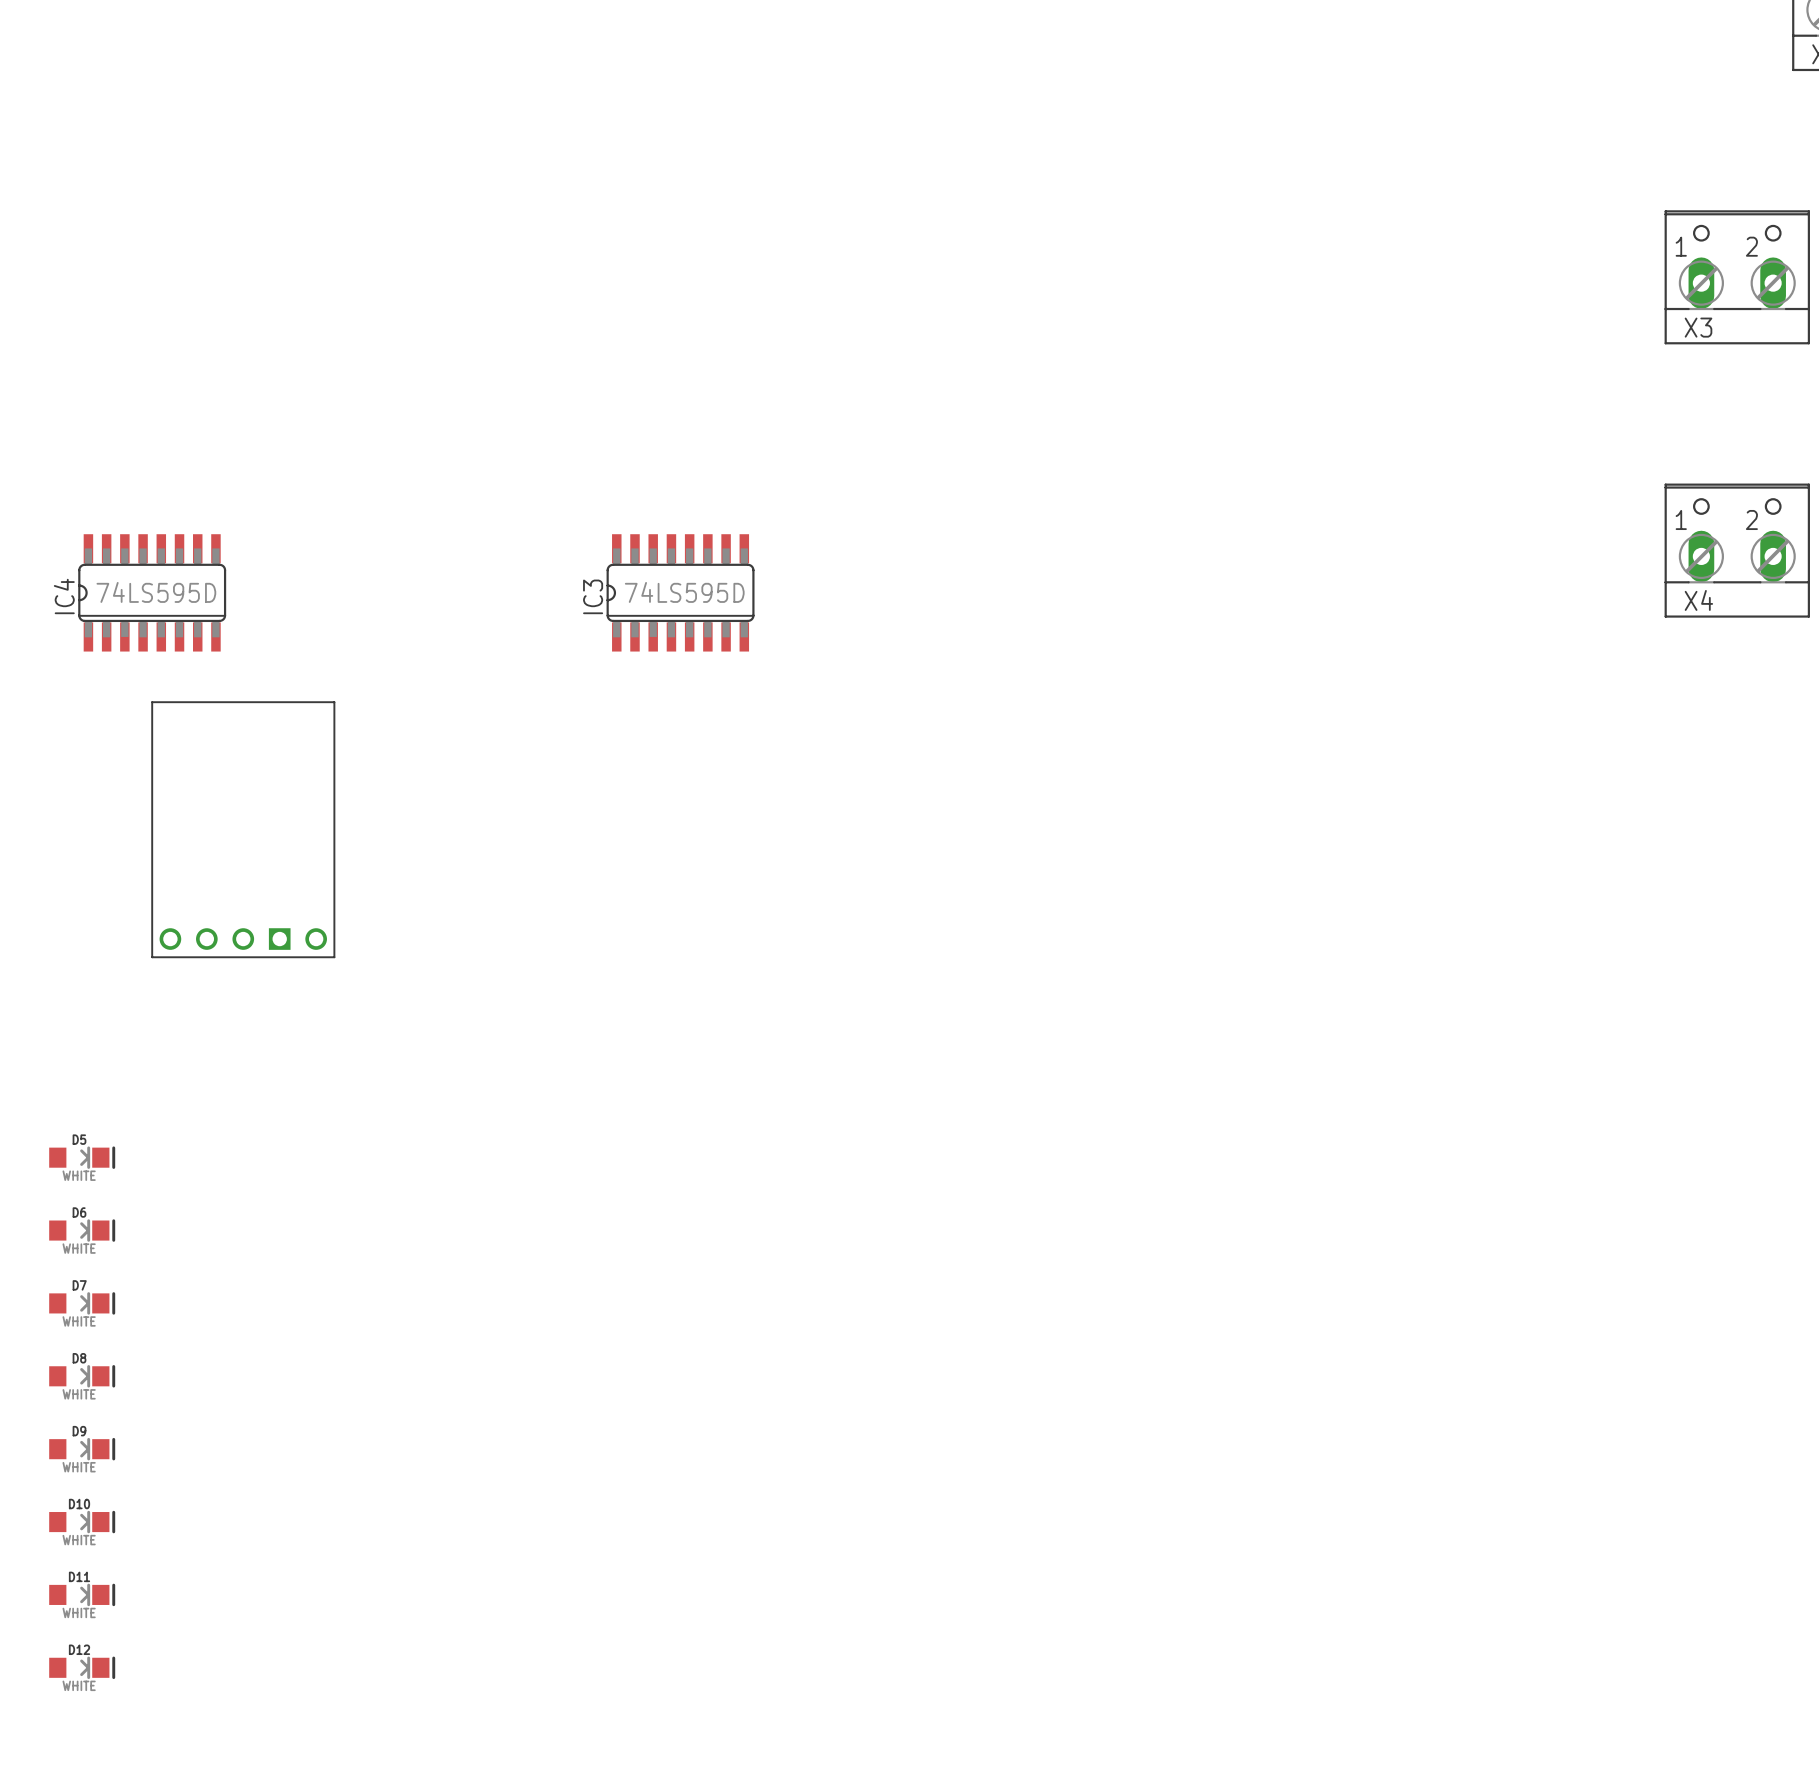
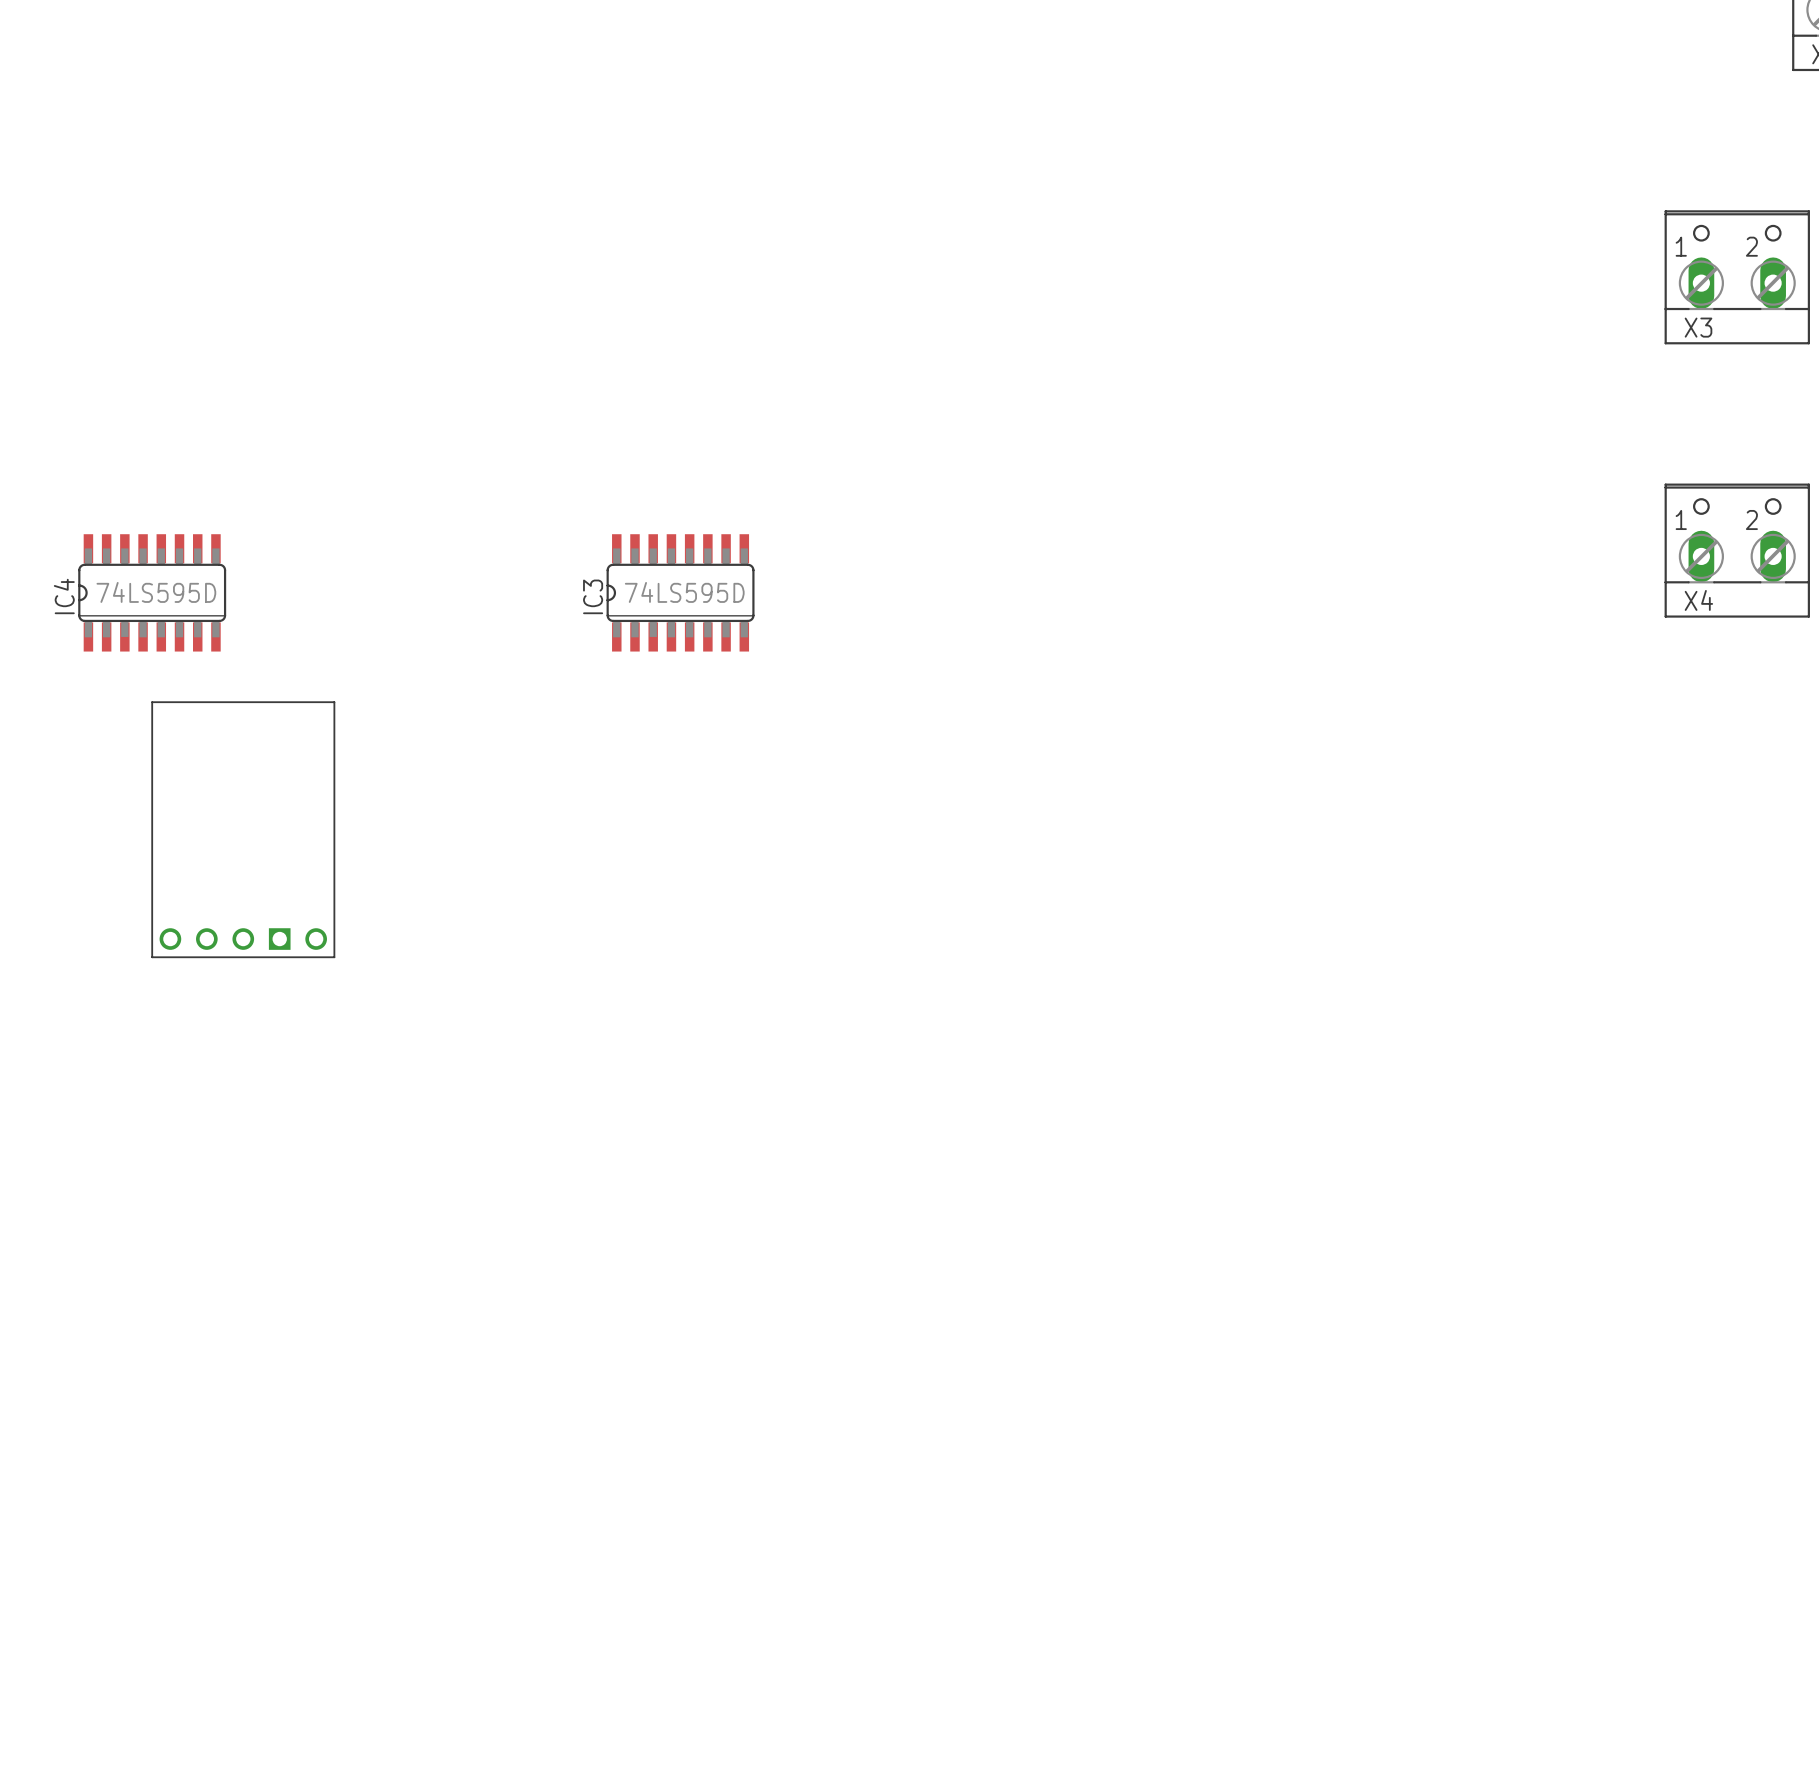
D5: WHITE (82, 1157) -> none
D6: WHITE (82, 1230) -> none
D7: WHITE (82, 1303) -> none
D8: WHITE (82, 1376) -> none
D9: WHITE (82, 1449) -> none
D10: WHITE (82, 1522) -> none
D11: WHITE (82, 1594) -> none
D12: WHITE (82, 1667) -> none

